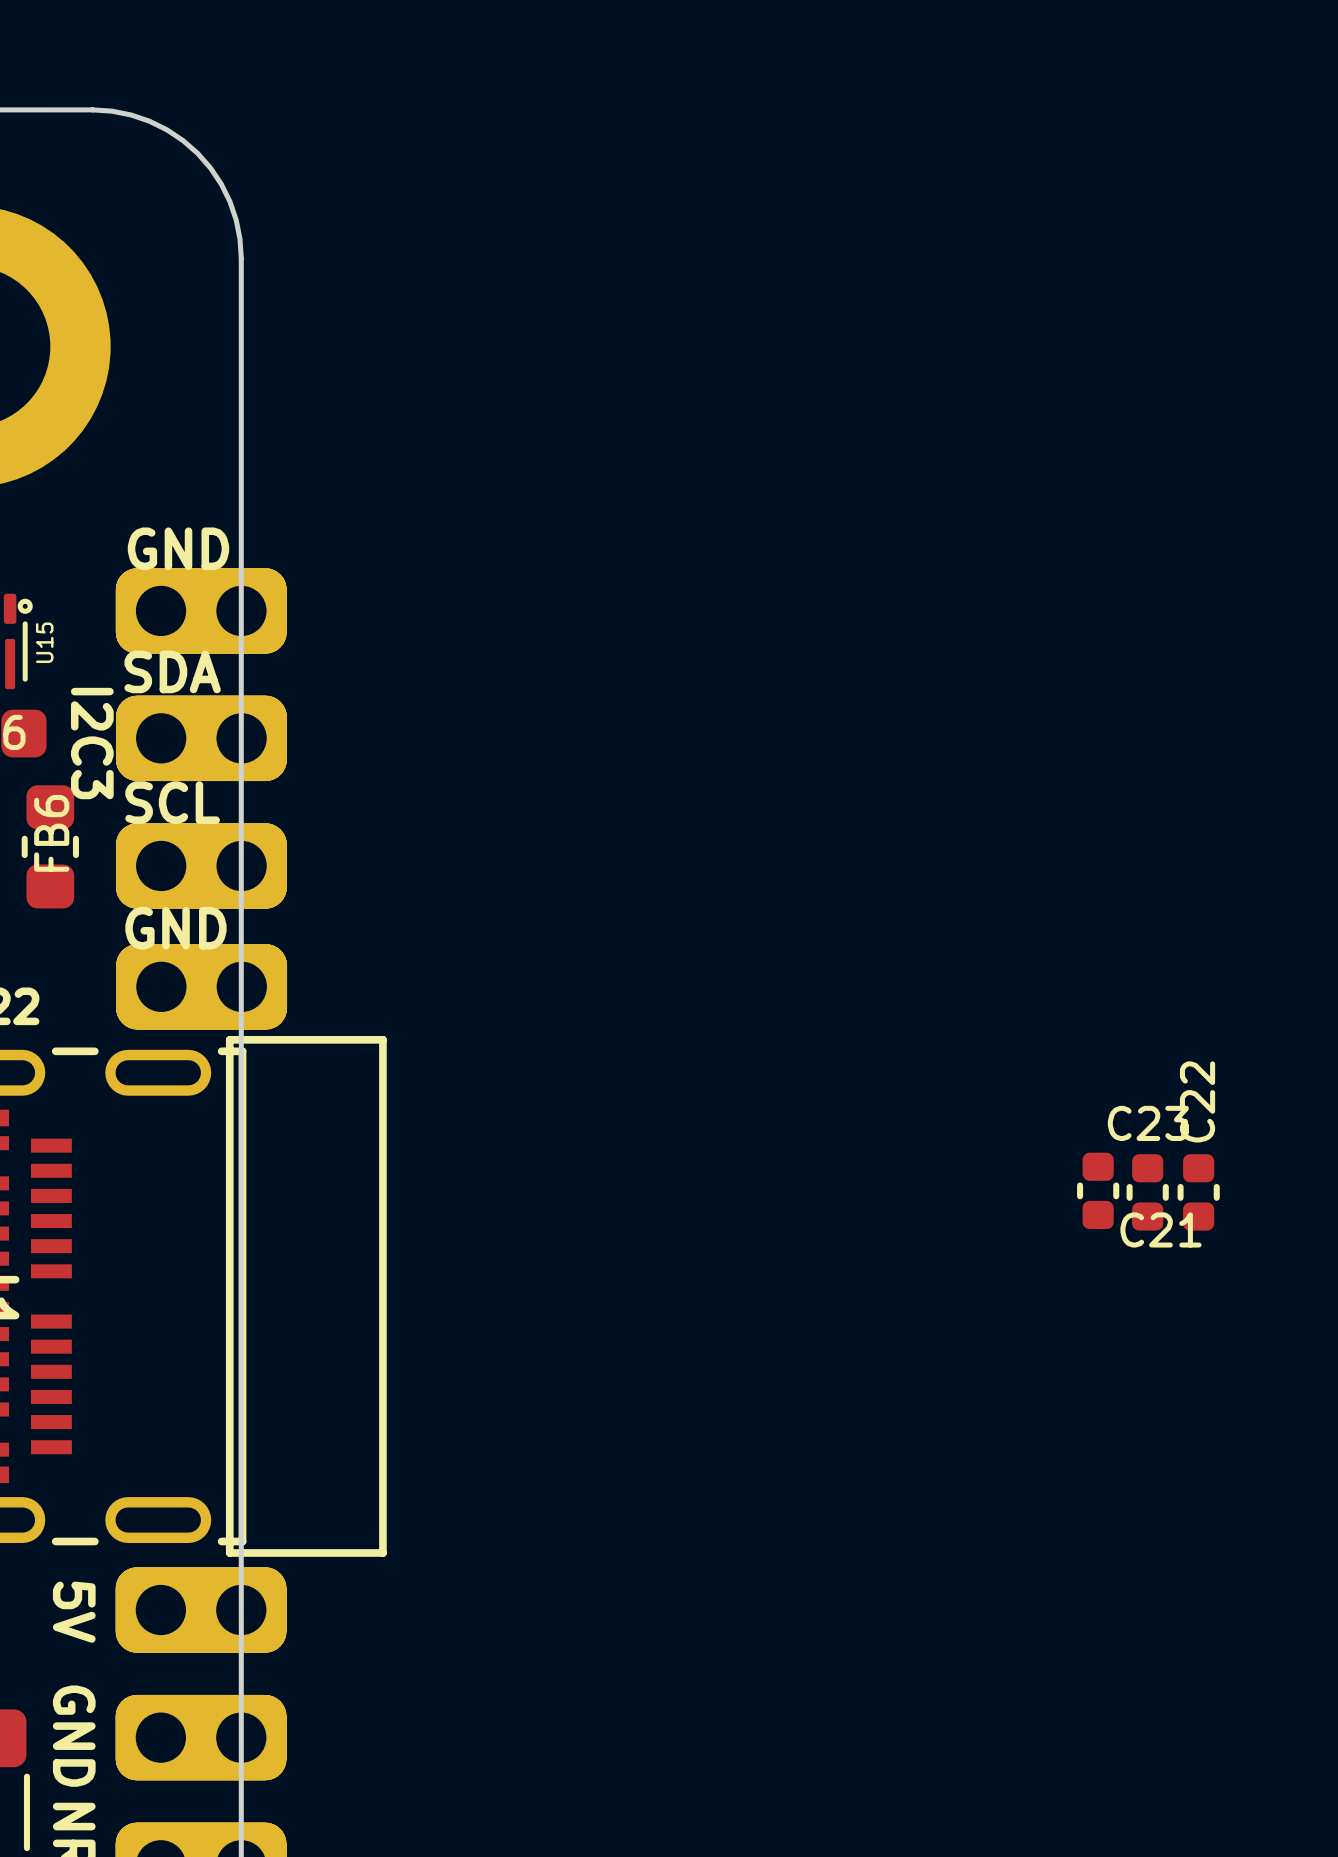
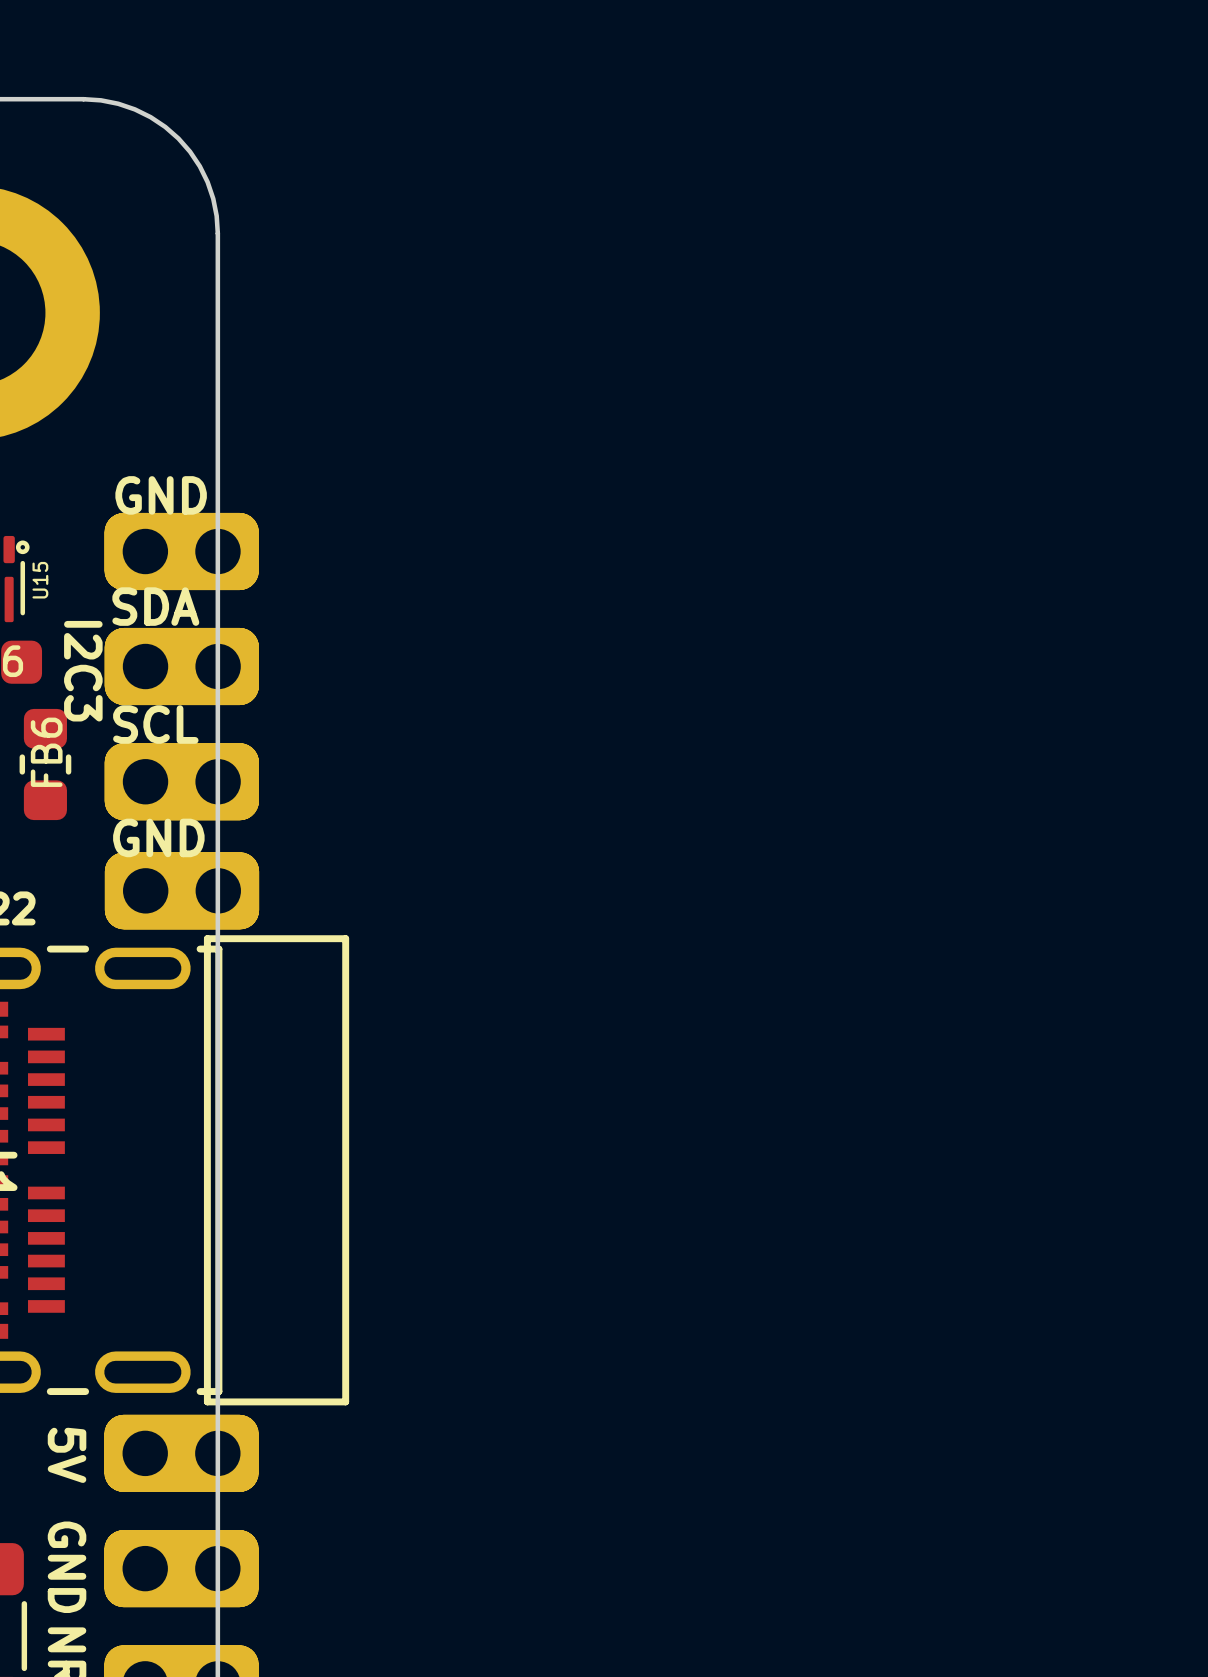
C21: (1098, 1190) -> none
C23: (1147, 1192) -> none
C22: (1198, 1192) -> none

